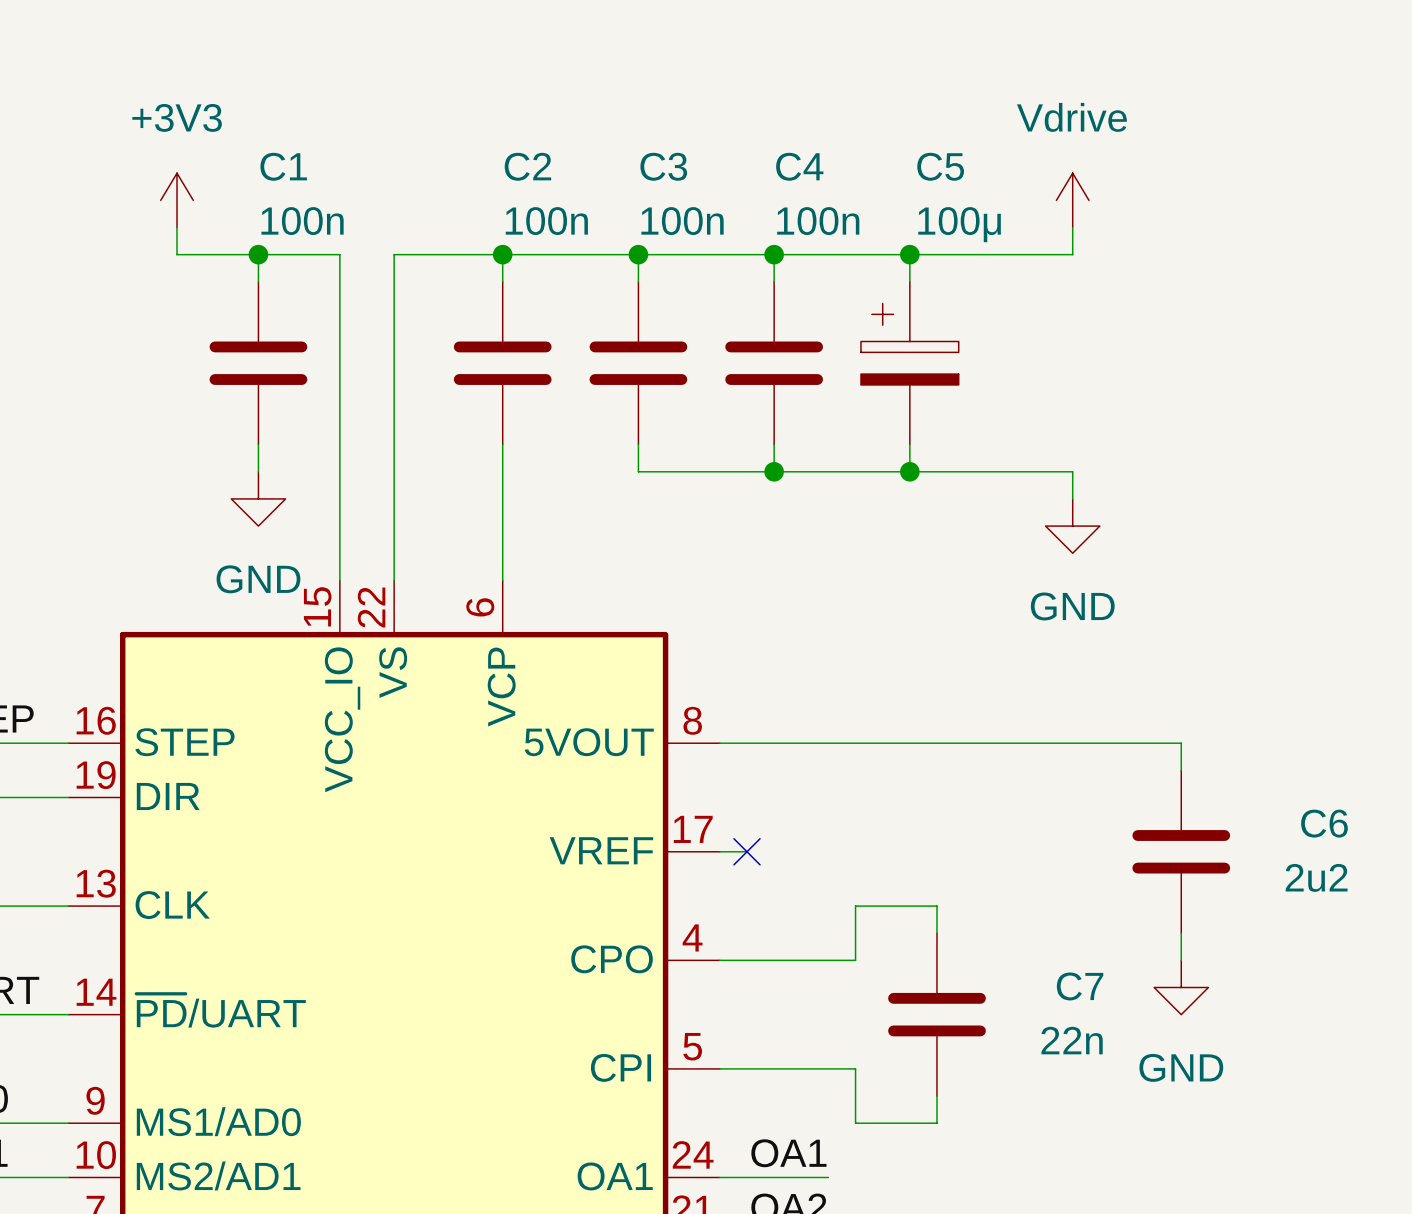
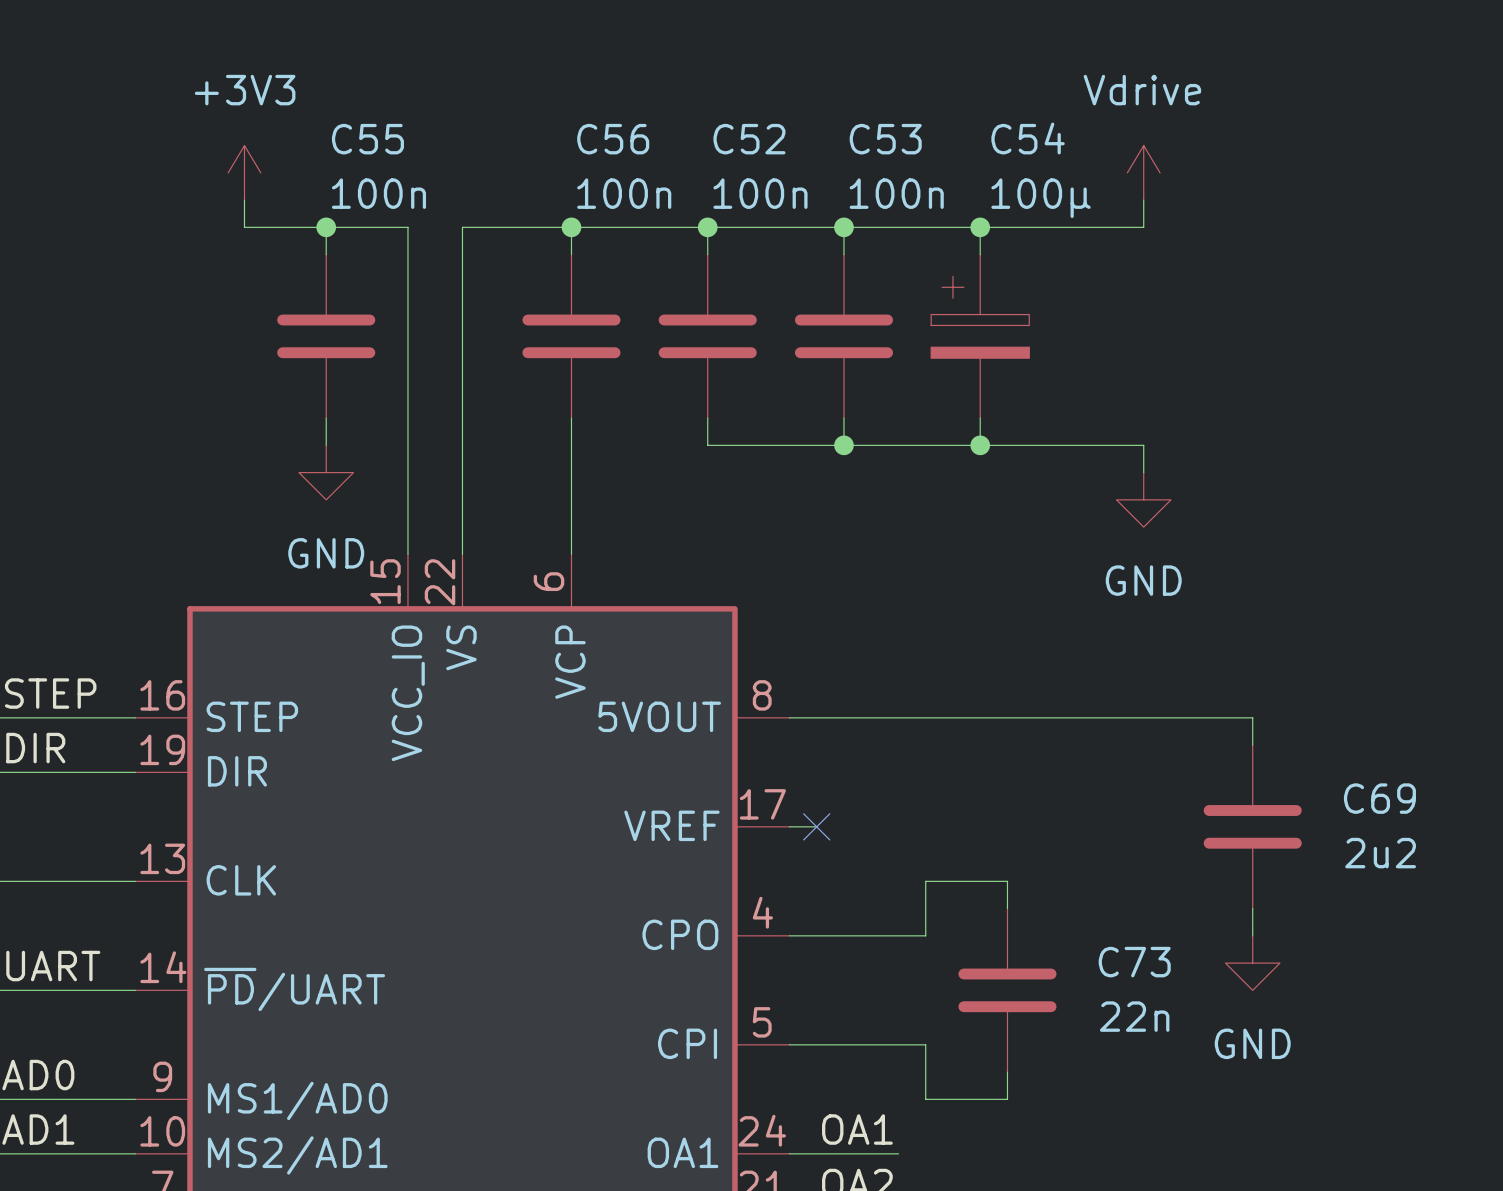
C1 name: C1 (283, 166) -> C55 (367, 139)
C2 name: C2 (527, 166) -> C56 (613, 139)
C3 name: C3 (663, 166) -> C52 (749, 139)
C4 name: C4 (799, 166) -> C53 (885, 139)
C5 name: C5 (940, 166) -> C54 (1028, 138)
C6 name: C6 (1324, 823) -> C69 (1379, 798)
C7 name: C7 (1080, 986) -> C73 (1134, 962)

